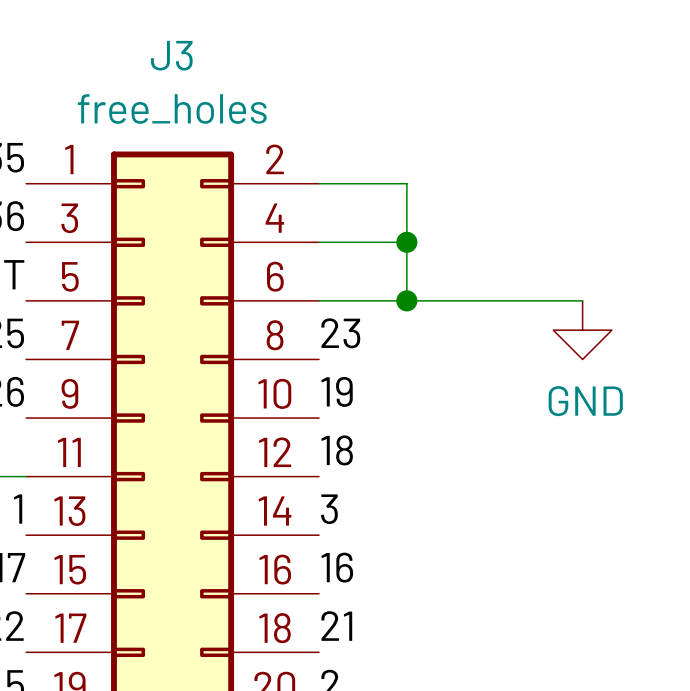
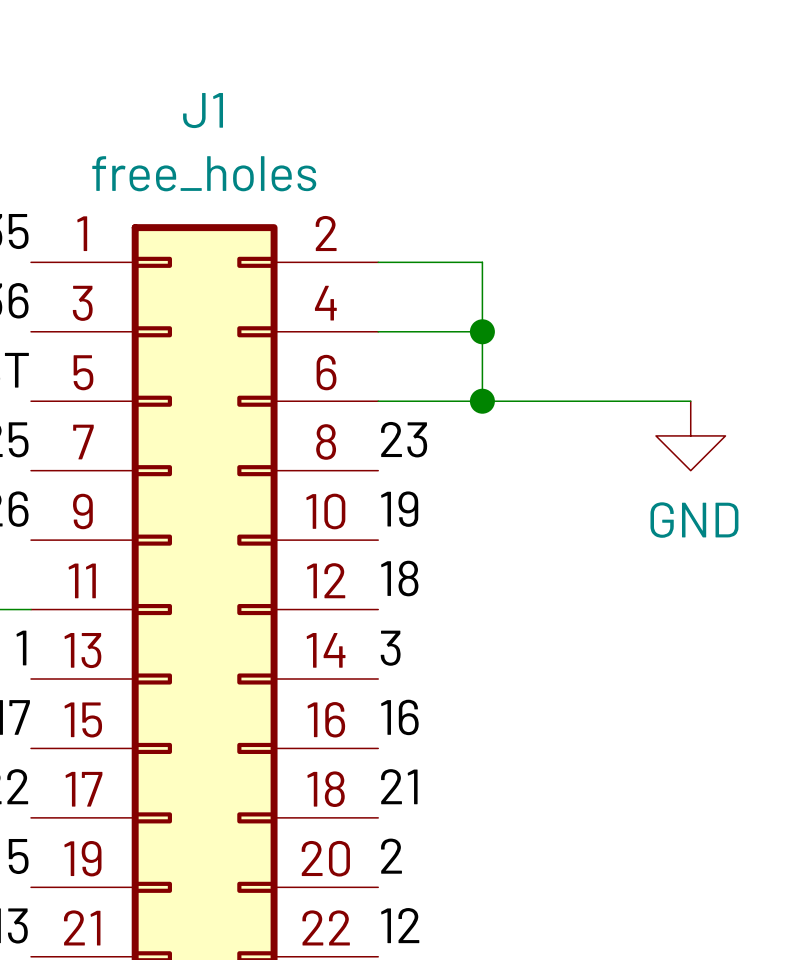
J3 name: J3 (171, 55) -> J1 (203, 110)

